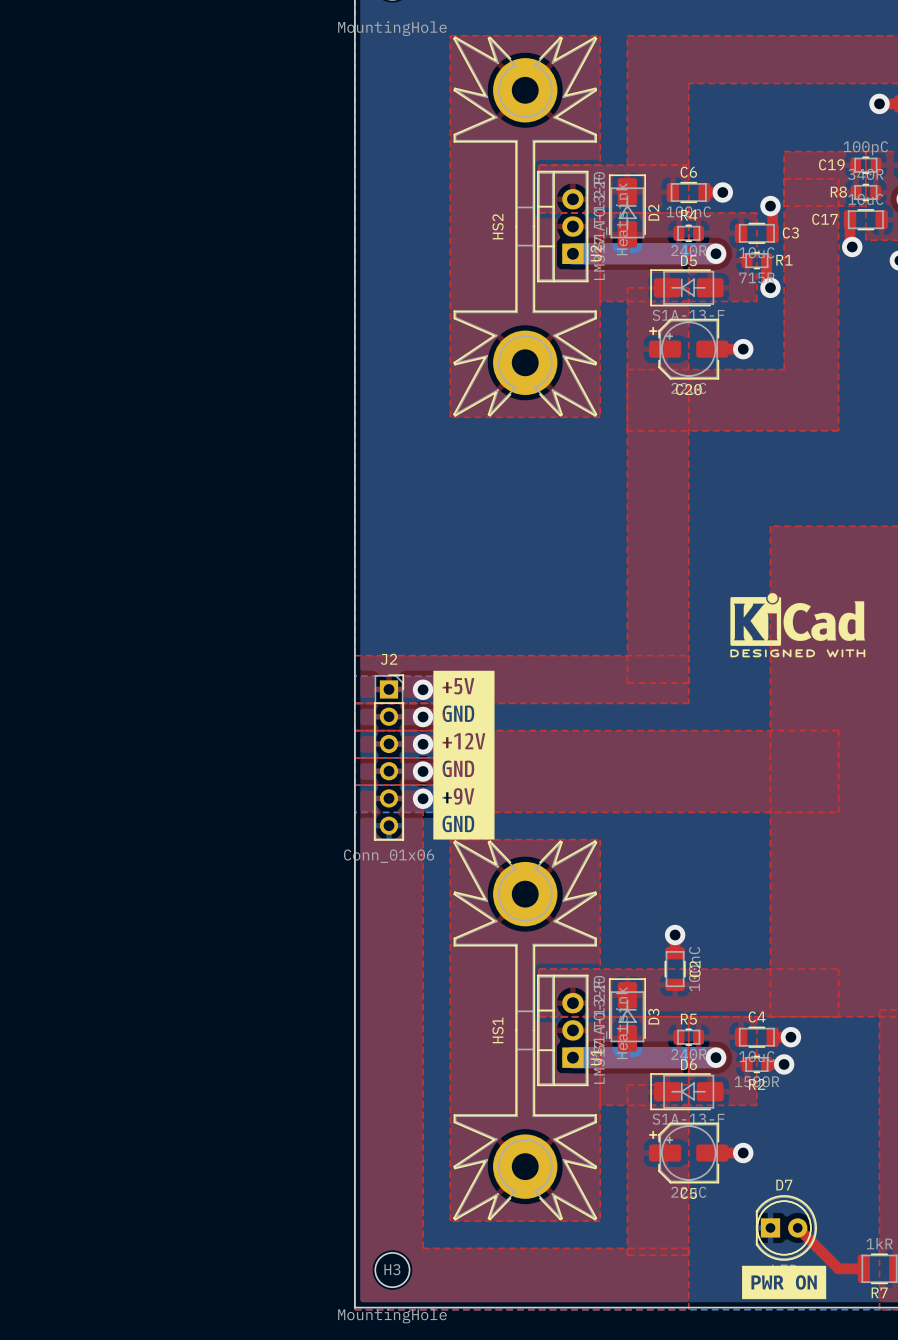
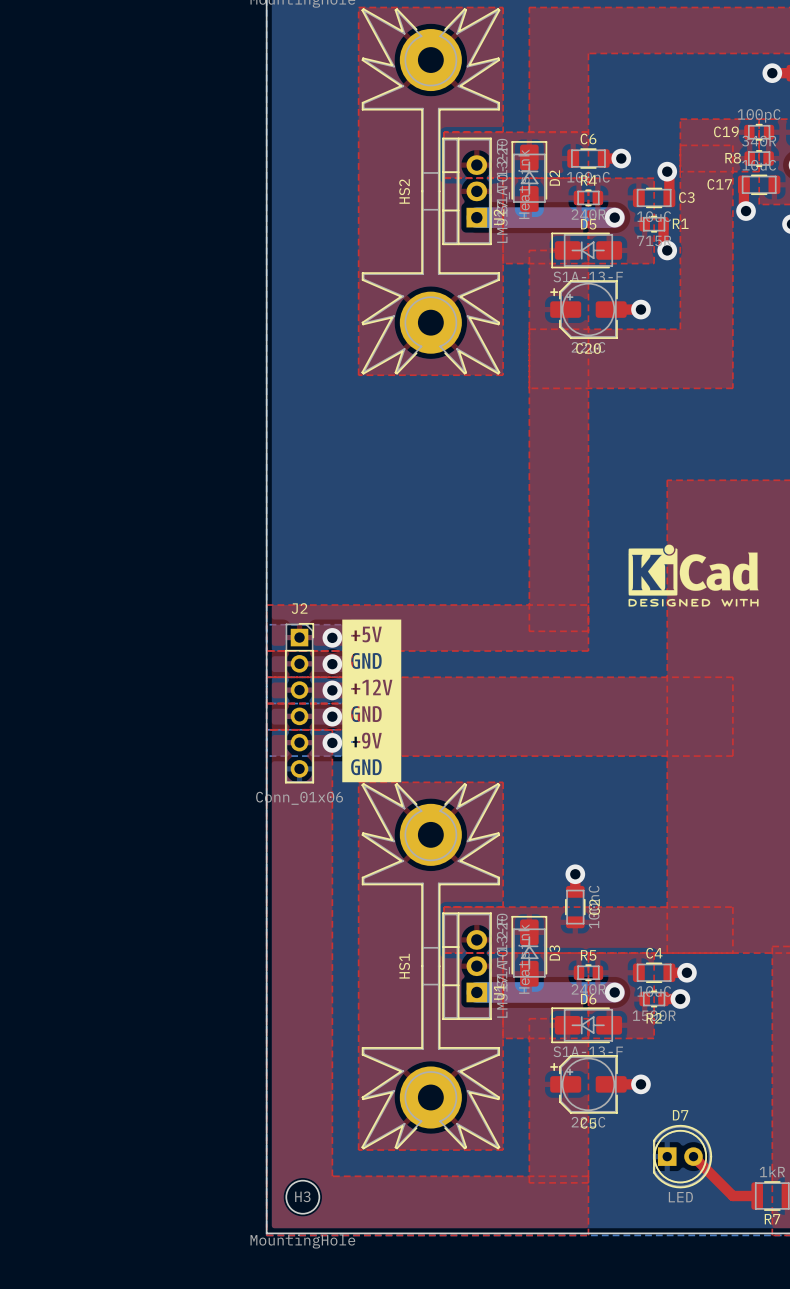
drawing: [742, 1265, 827, 1300] -> none

